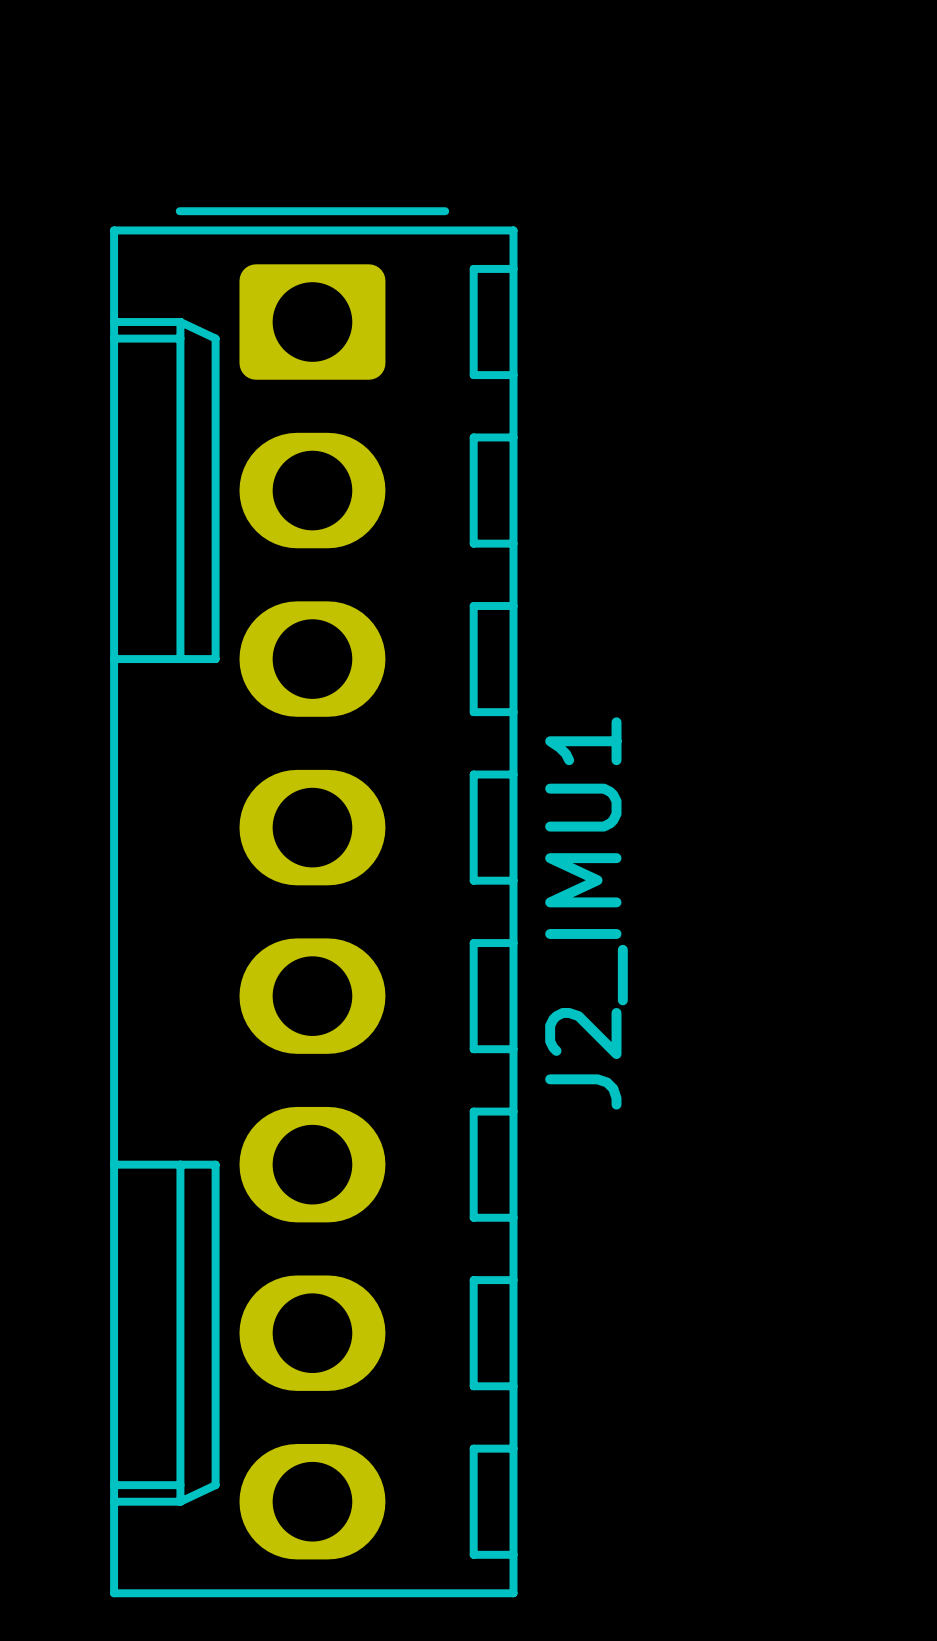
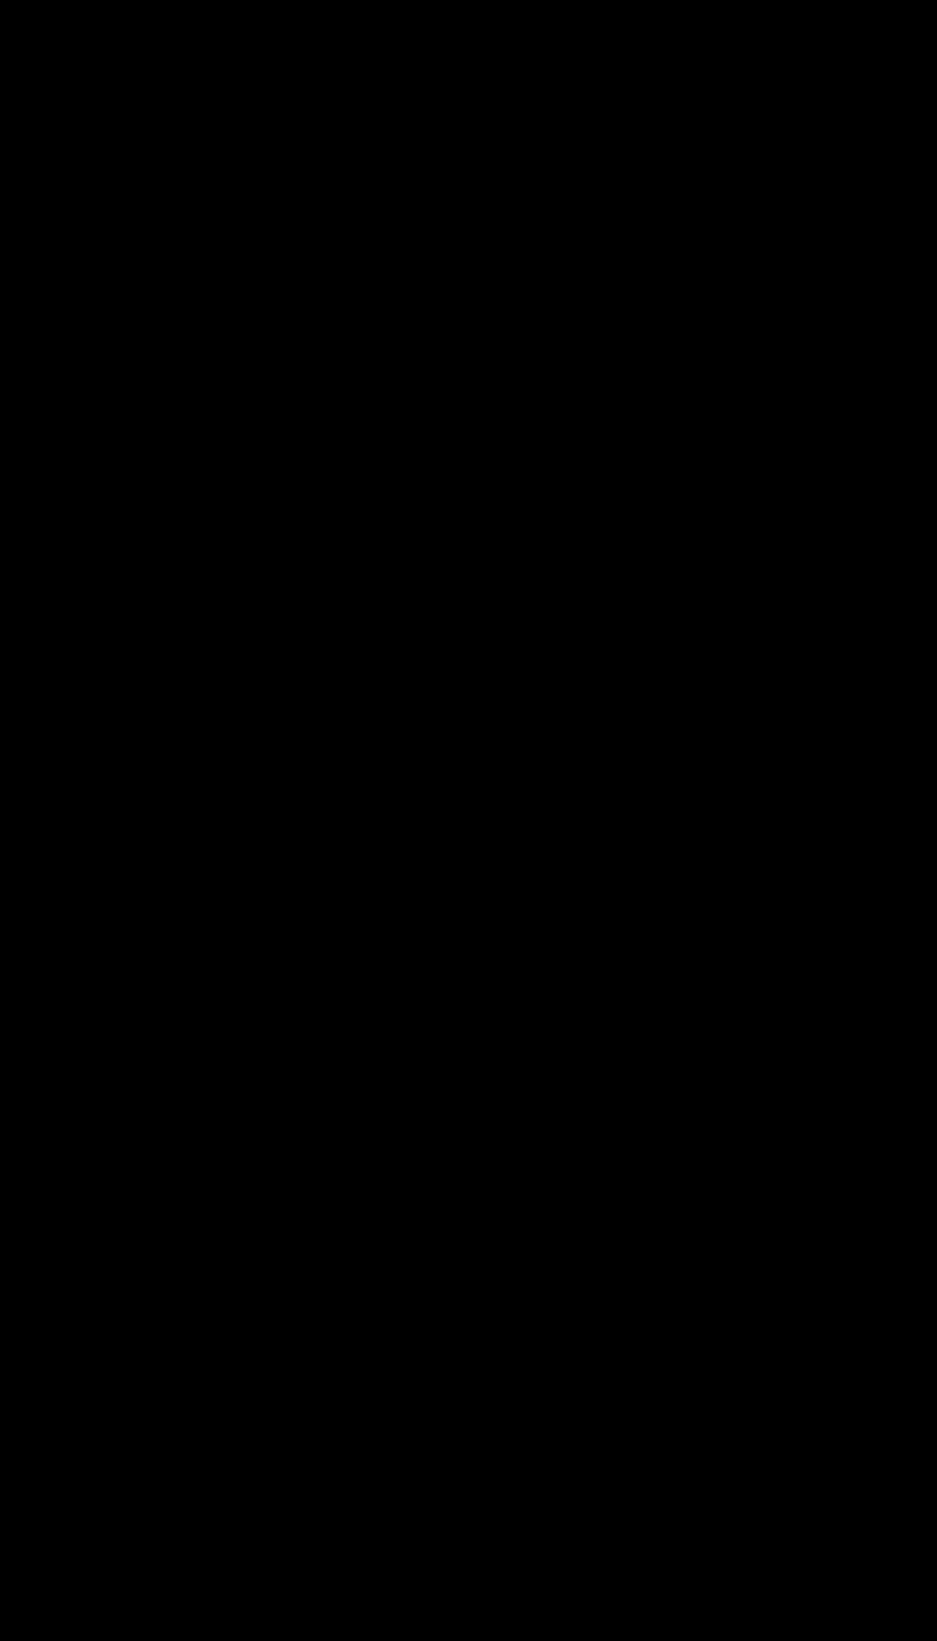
J2_IMU1: (313, 902) -> none

